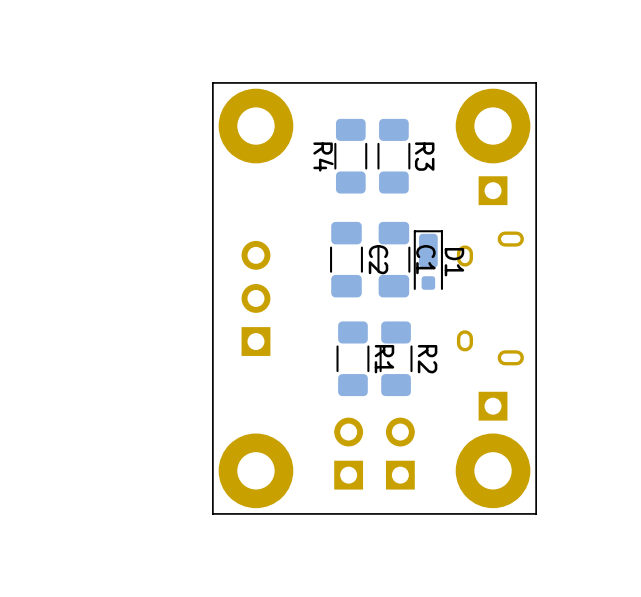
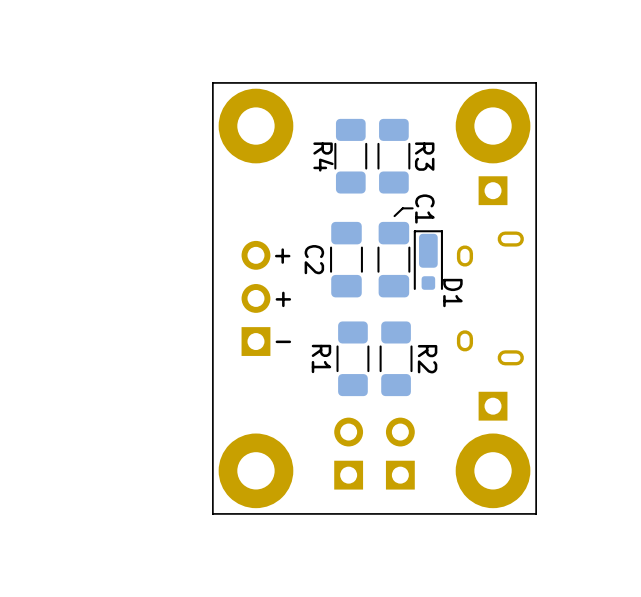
line: none -> (412, 208) (402, 208) (394, 216)
text: none -> + (282, 256)
C2 name position: C2 (378, 259) -> C2 (314, 259)
C1 name position: C1 (425, 259) -> C1 (424, 209)
D1 name position: D1 (454, 262) -> D1 (452, 293)
text: none -> + (283, 299)
text: none -> - (283, 341)
R1 name position: R1 (384, 359) -> R1 (321, 358)

